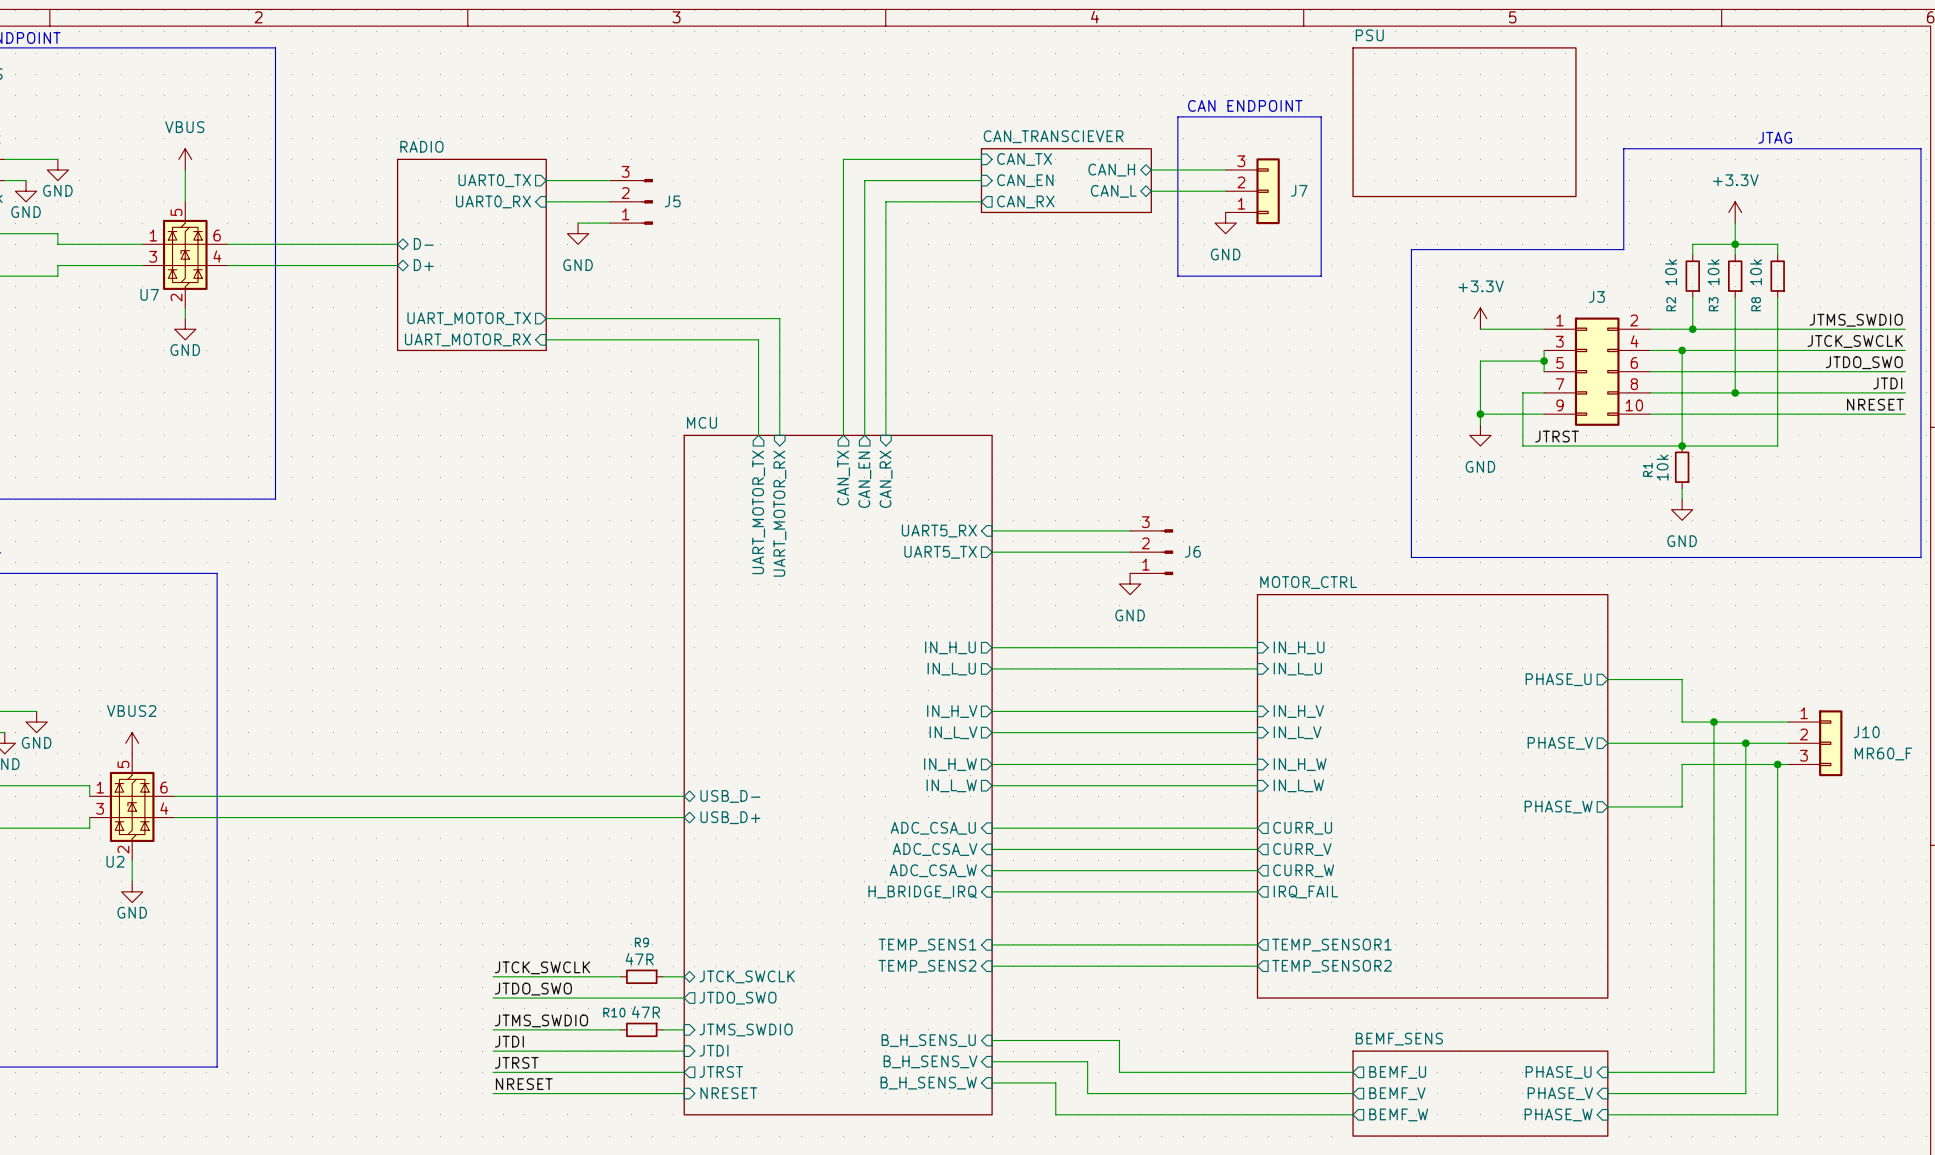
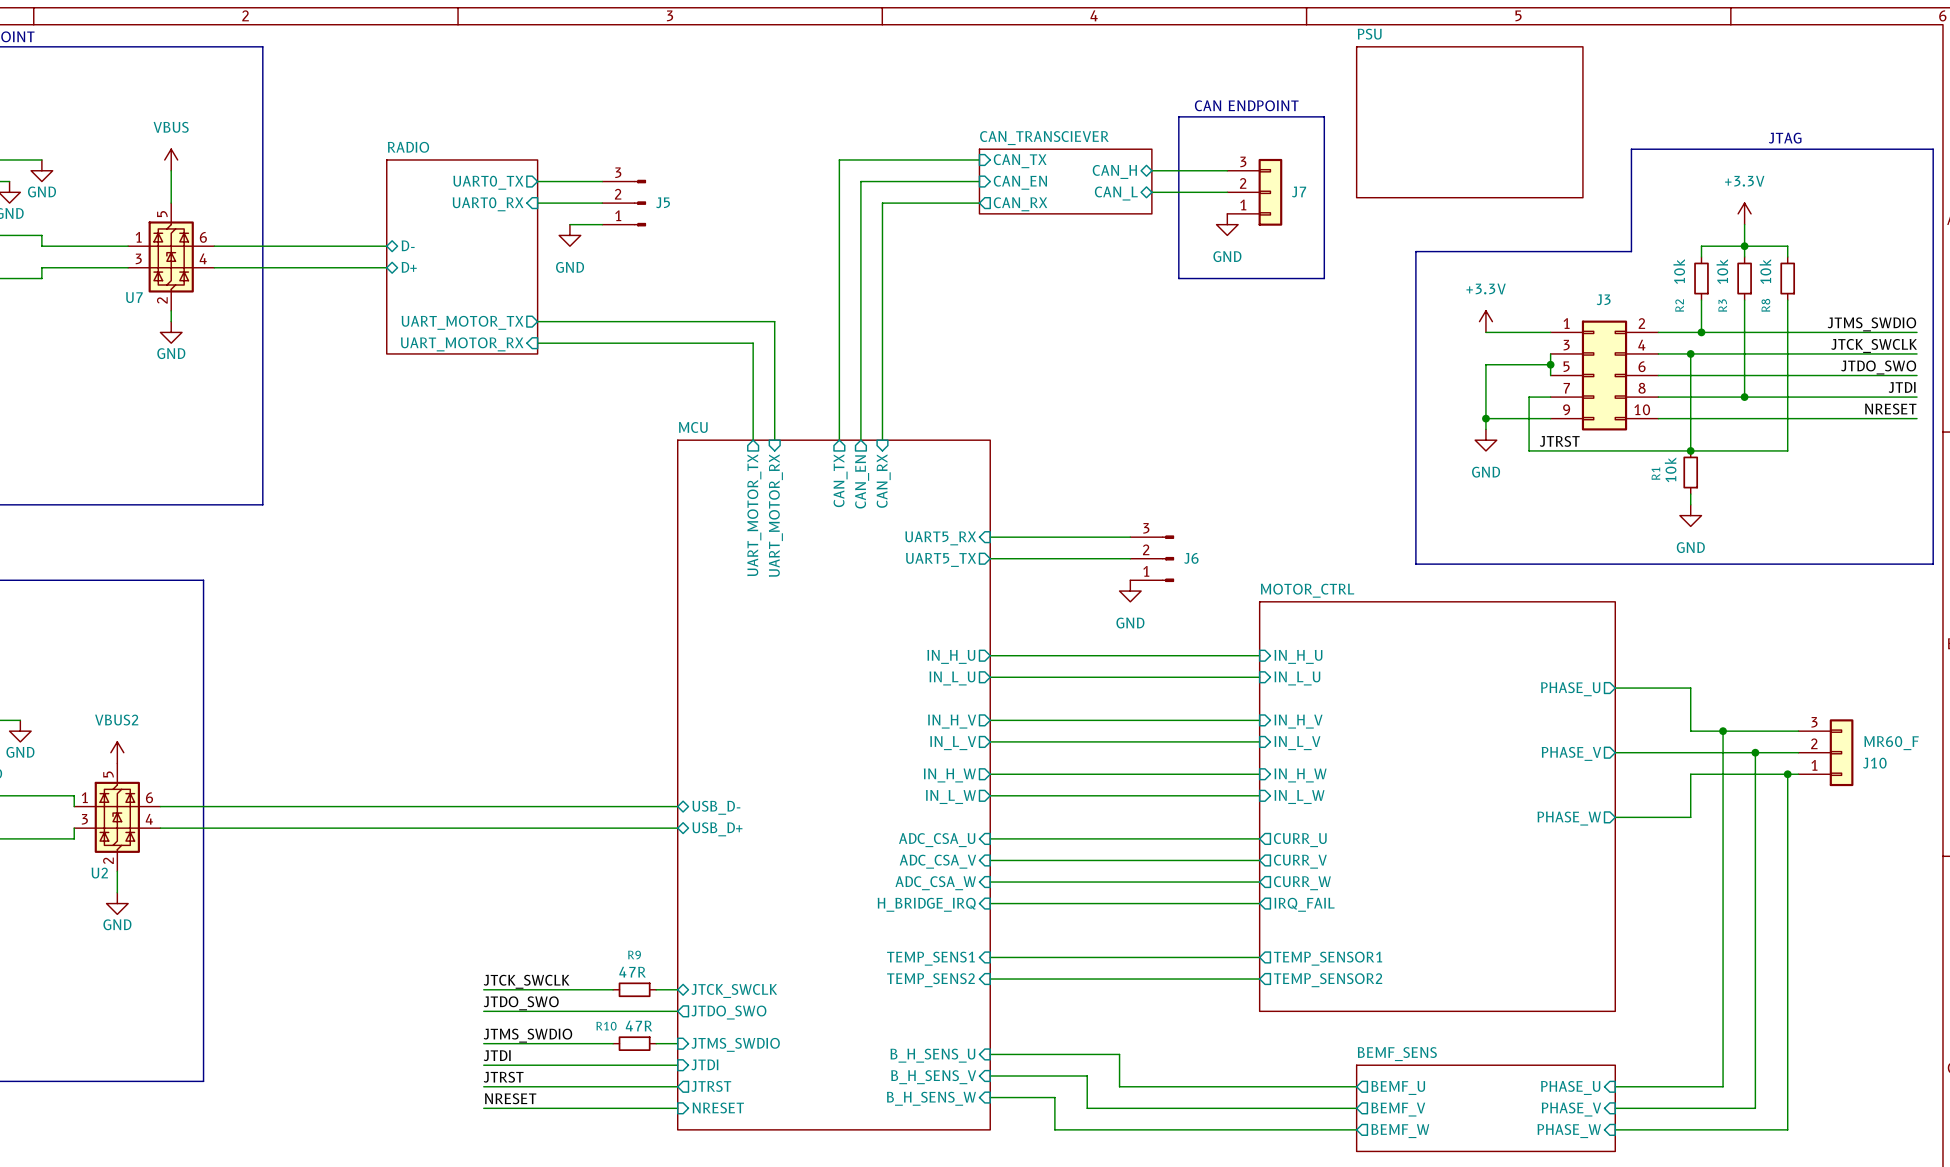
J10 flip: as is (1830, 743) -> up-down (1841, 752)

